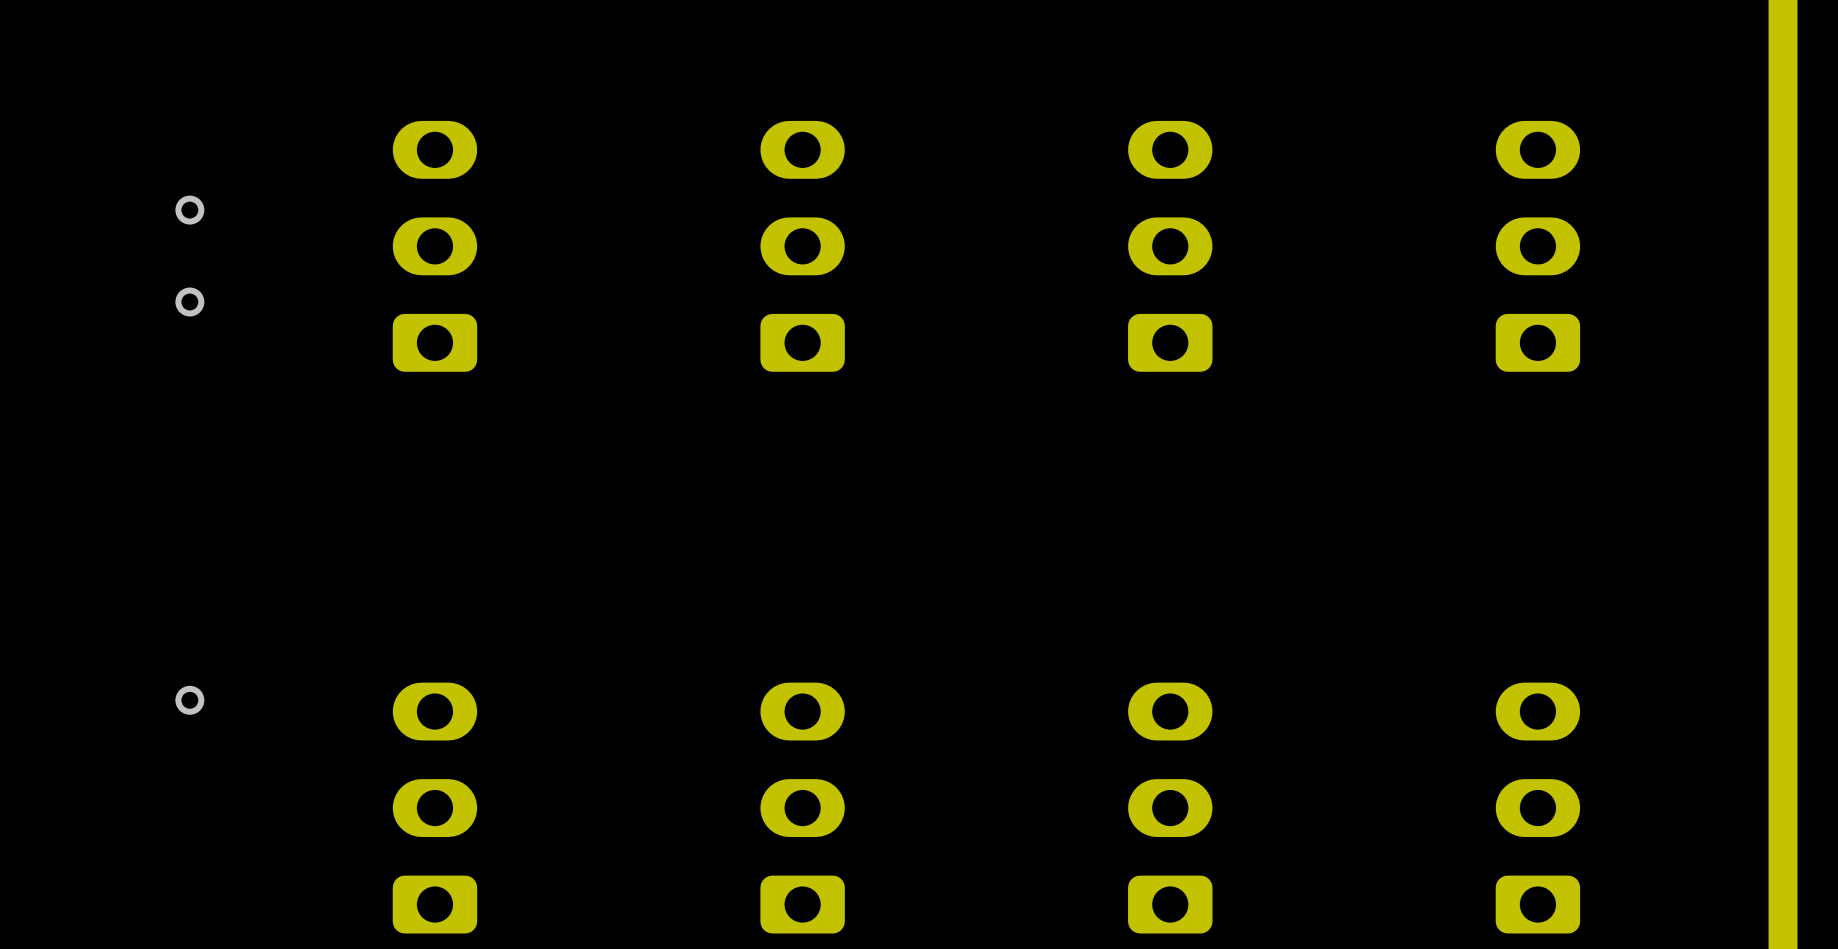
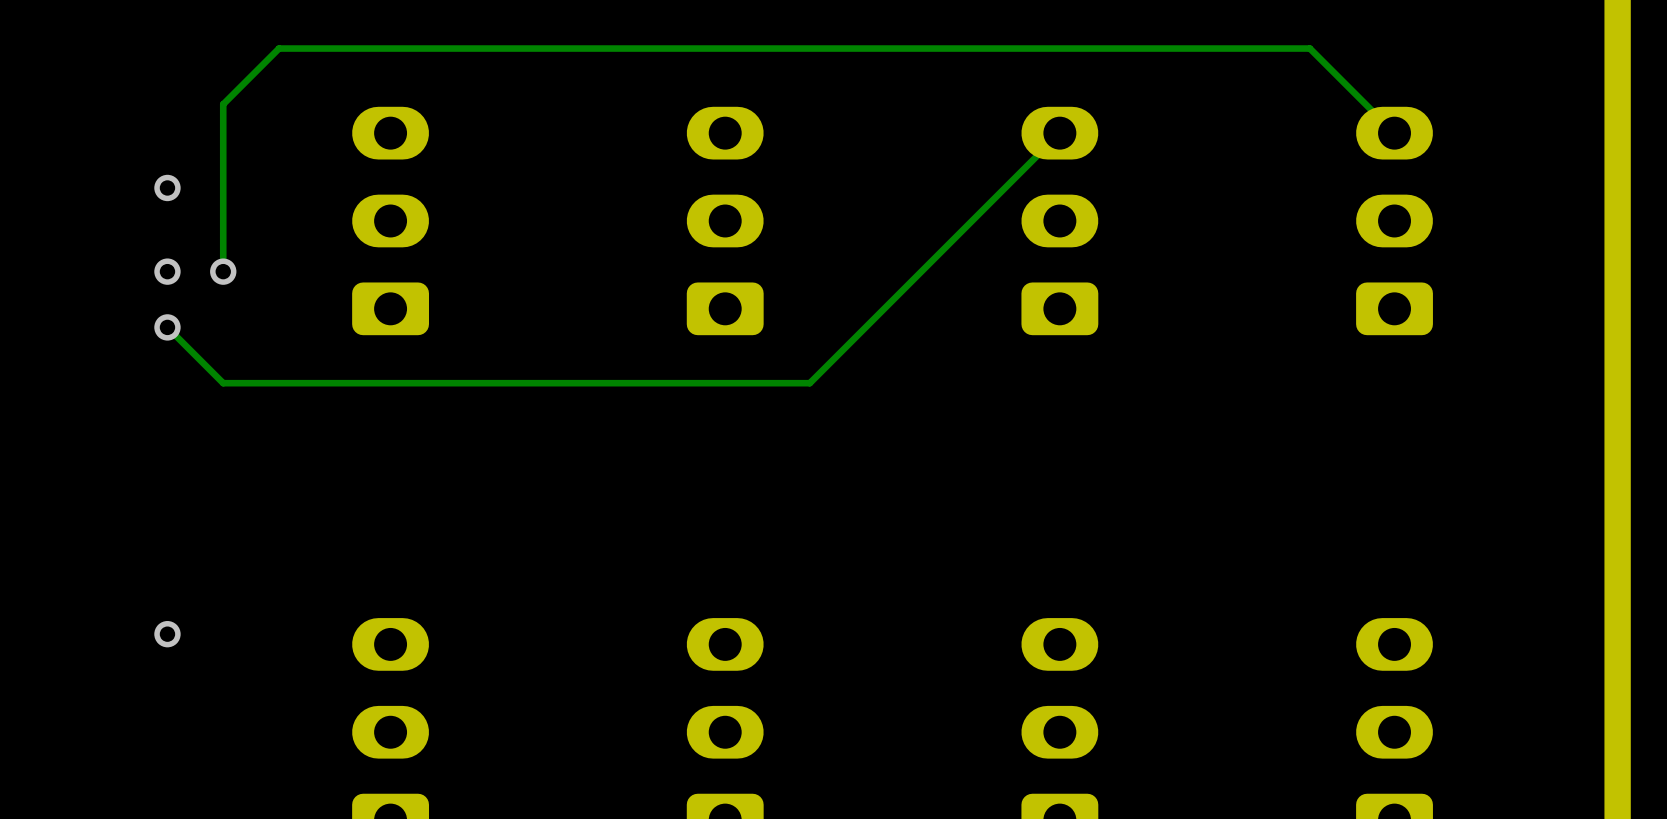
track: none -> (1059, 133) (809, 383) (223, 383) (167, 327)
track: none -> (1394, 133) (1309, 48) (279, 48) (223, 104) (223, 271)
via: none -> (223, 271)
via: none -> (167, 327)

